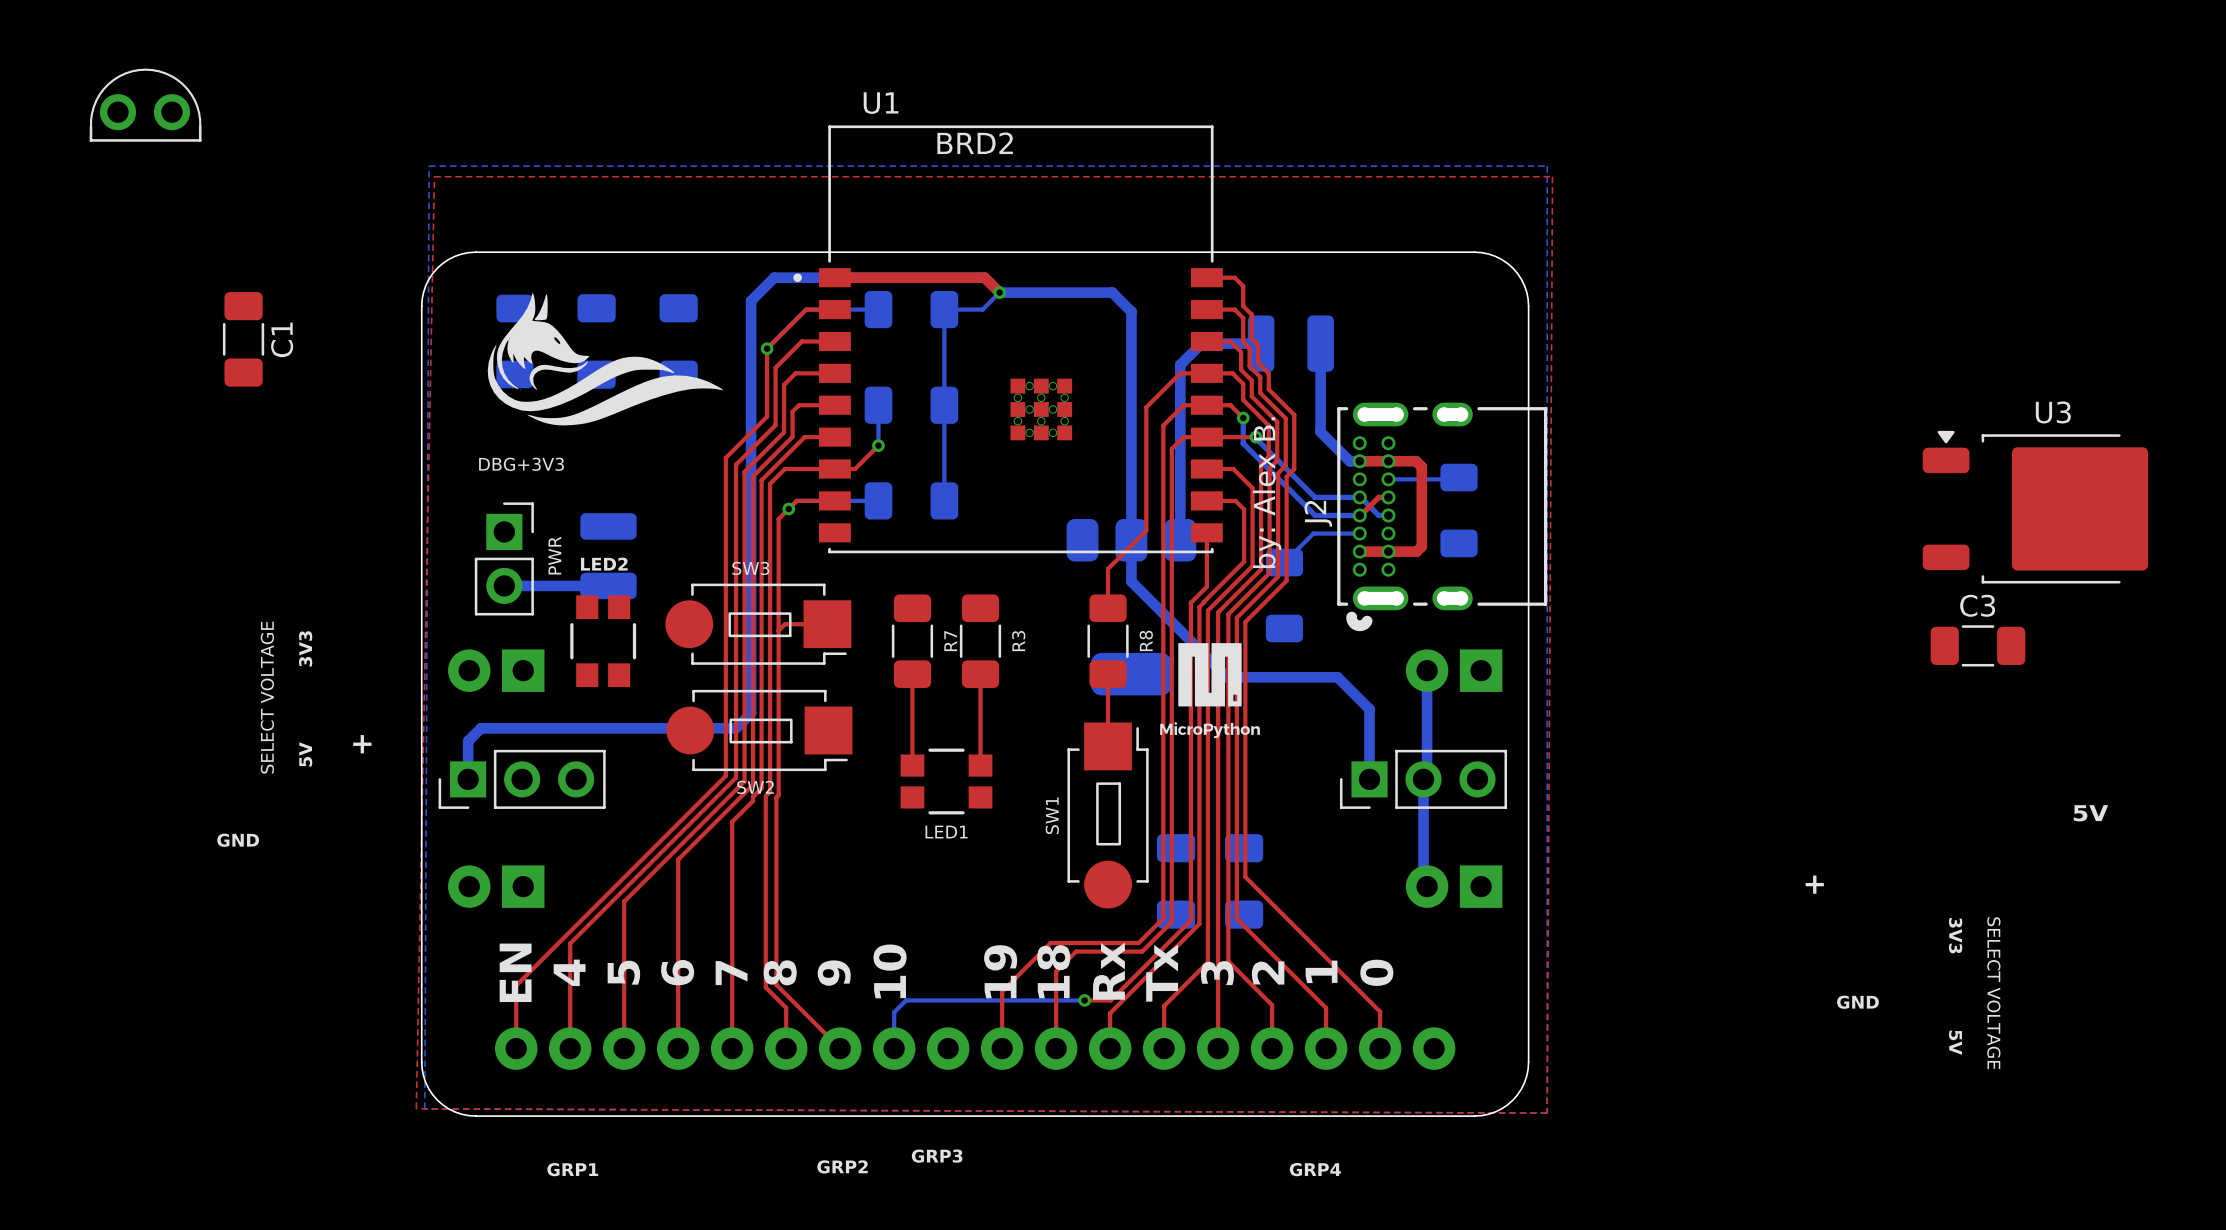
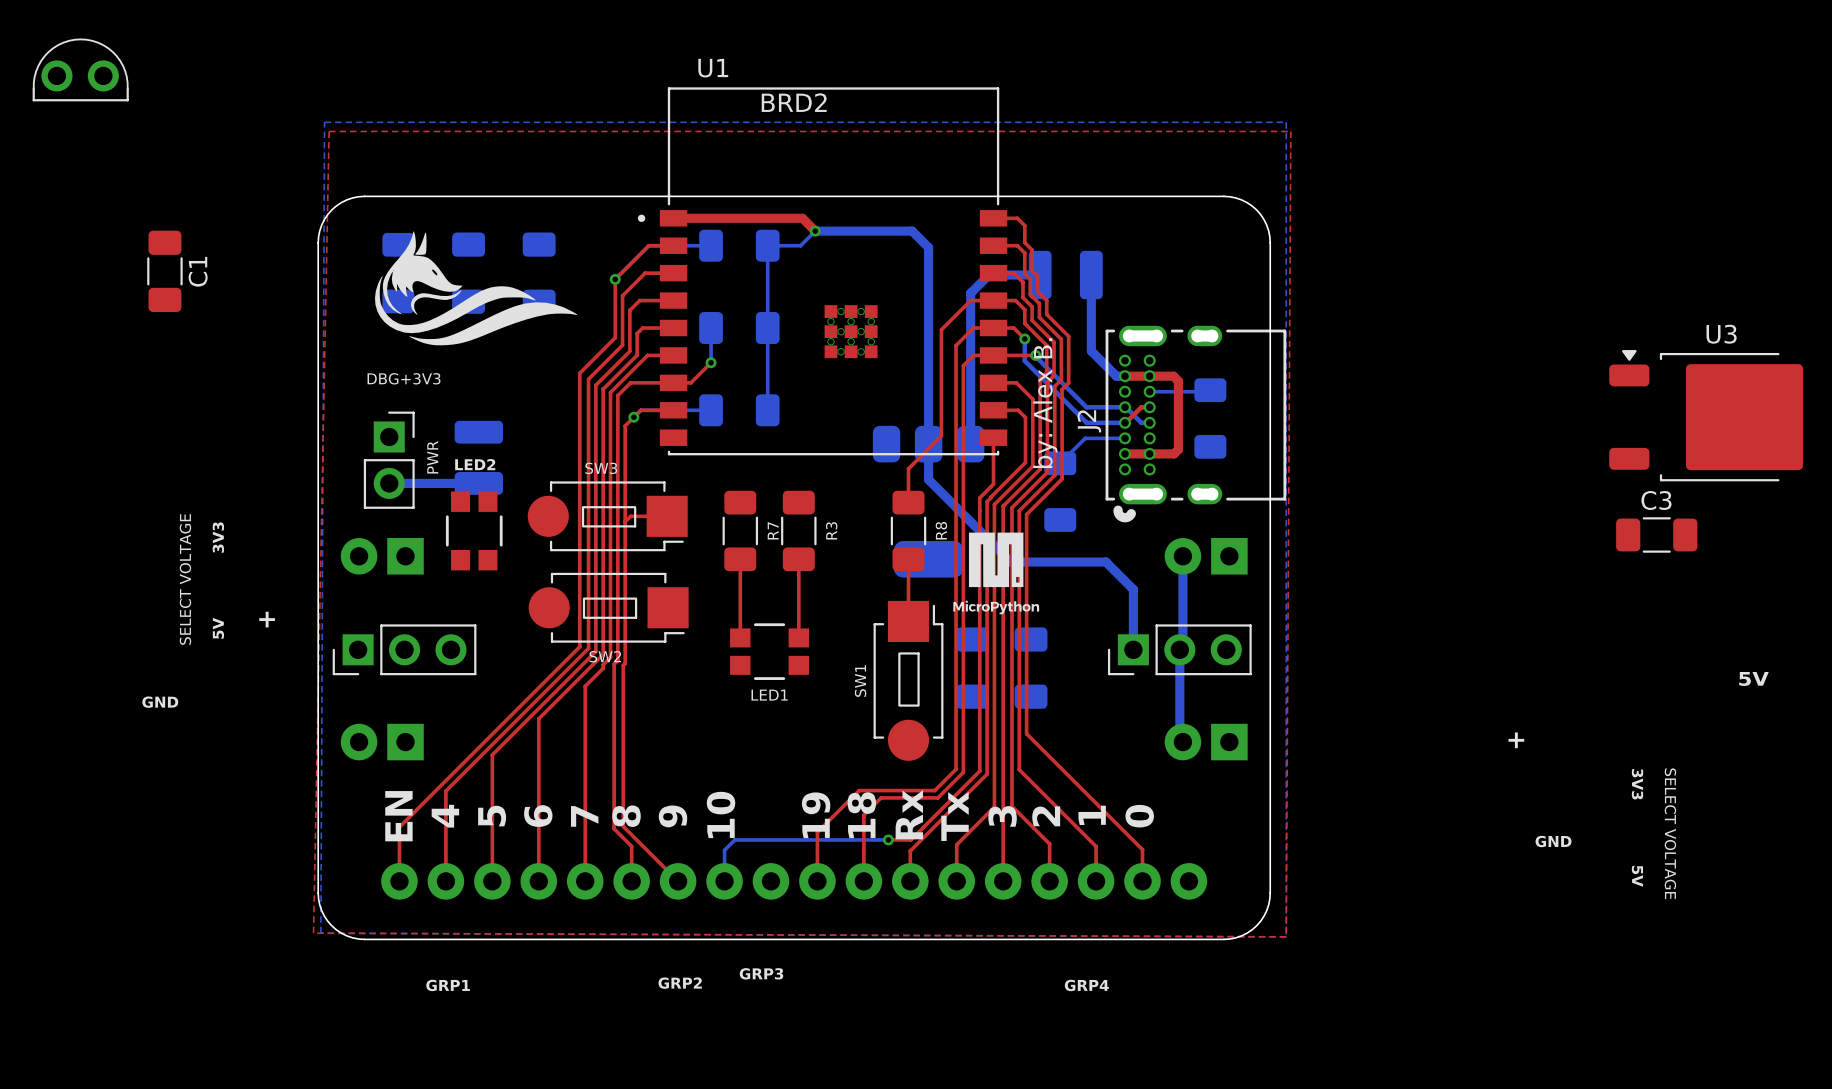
bottom track: (999, 292) (984, 277) (774, 277) (751, 300) (751, 713) (736, 728) (480, 728) (468, 741) (468, 779) -> none
part: none -> (972, 668)
part: none -> (1031, 668)
part: (1176, 881) -> none
part: (1244, 881) -> none

